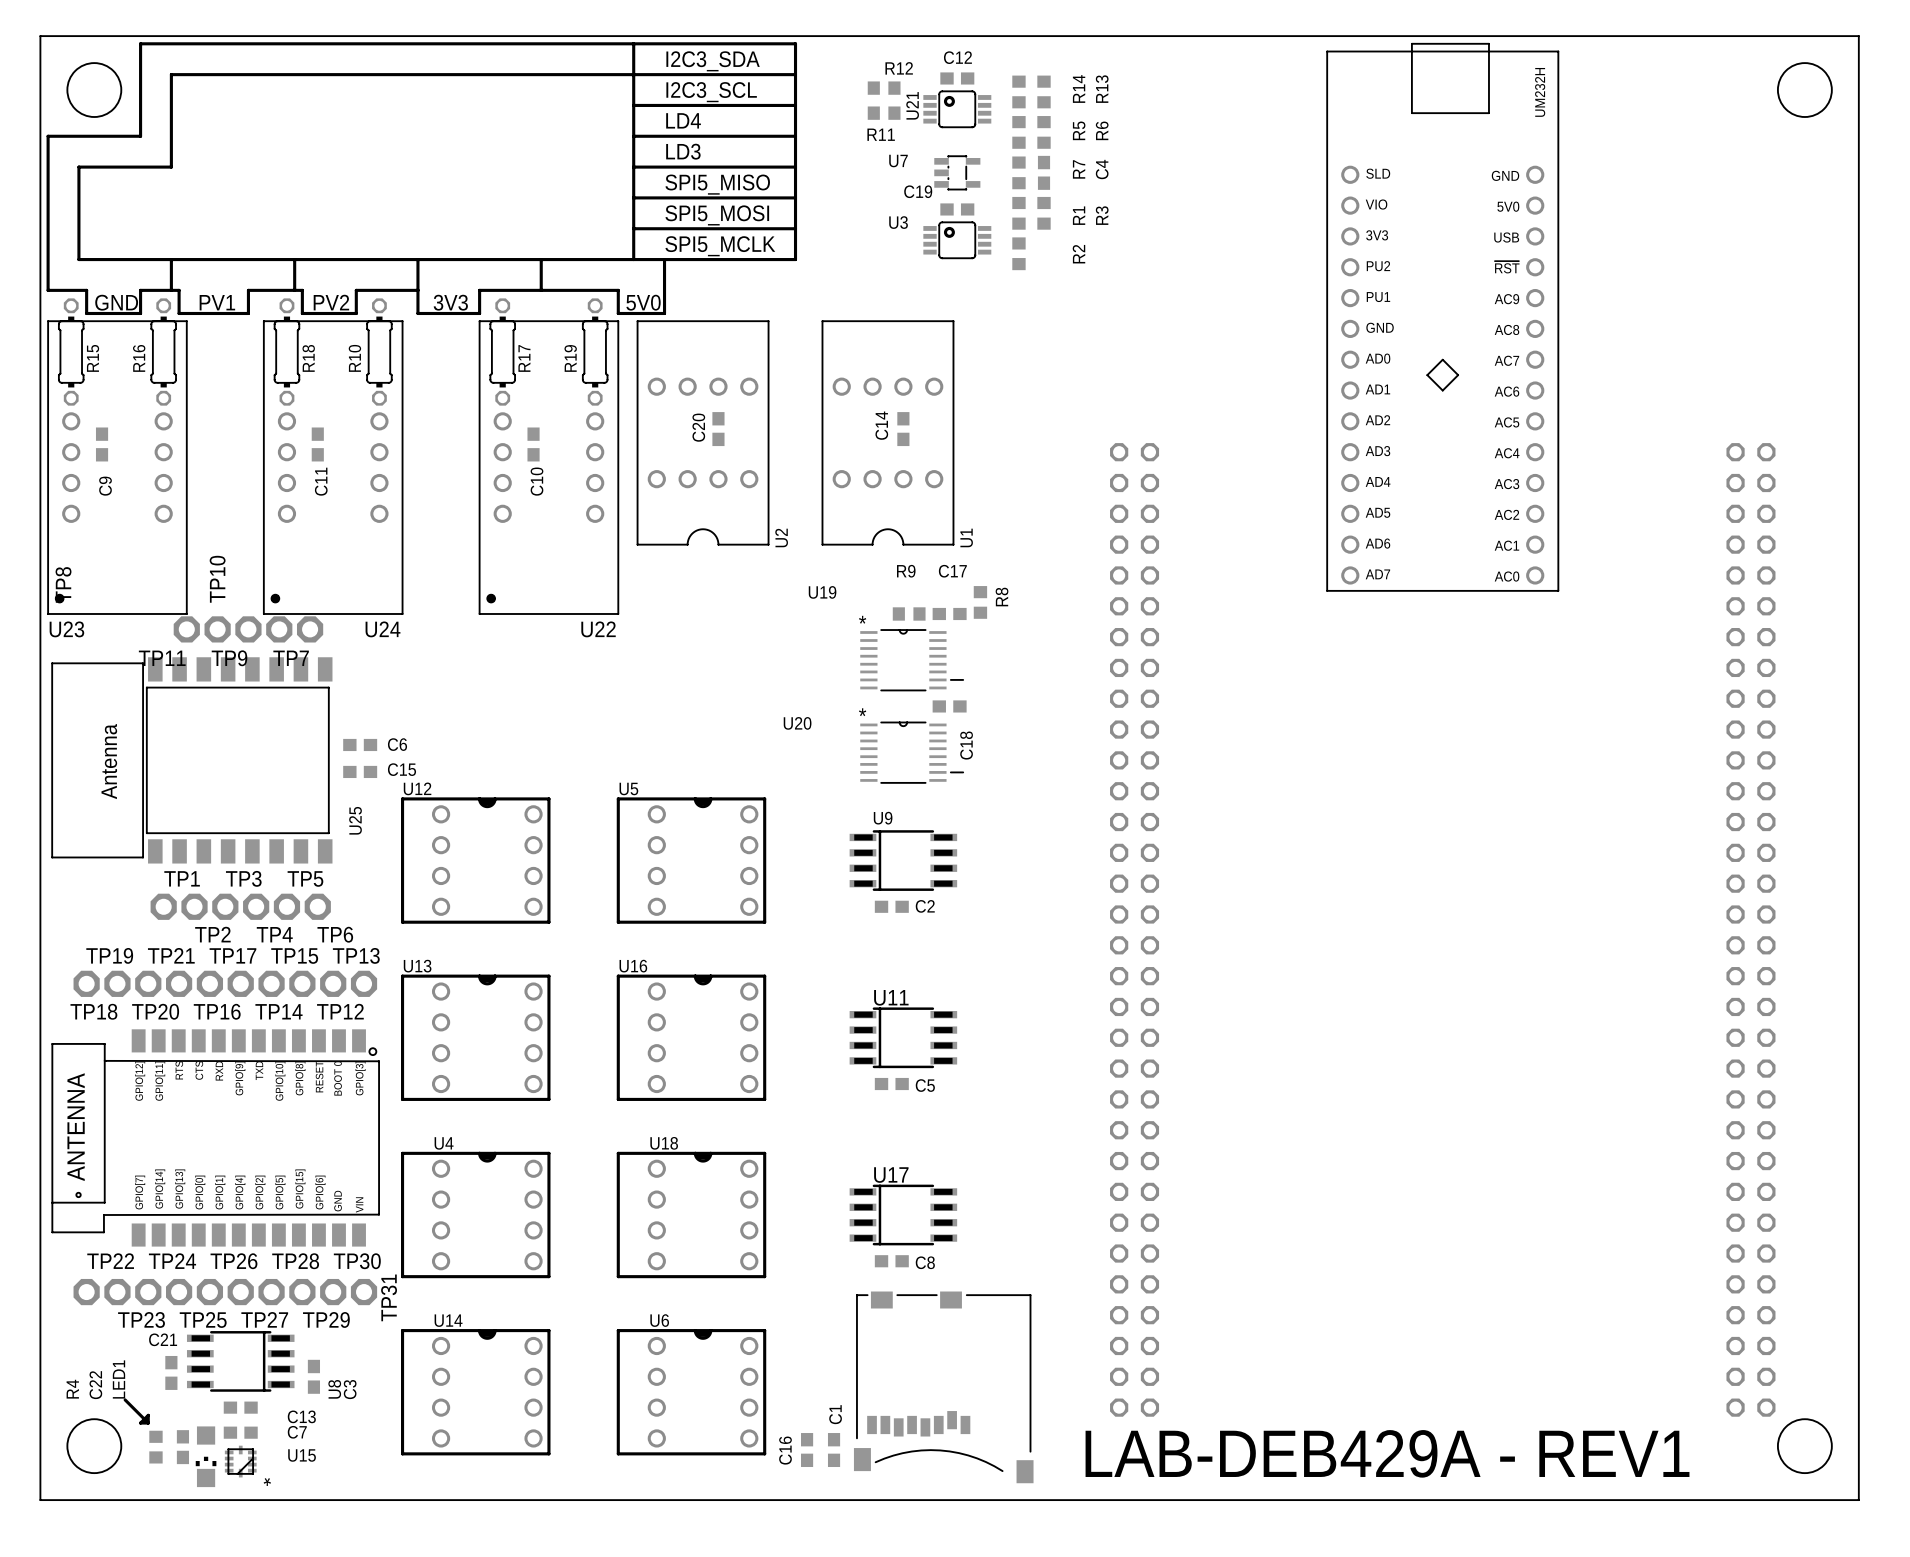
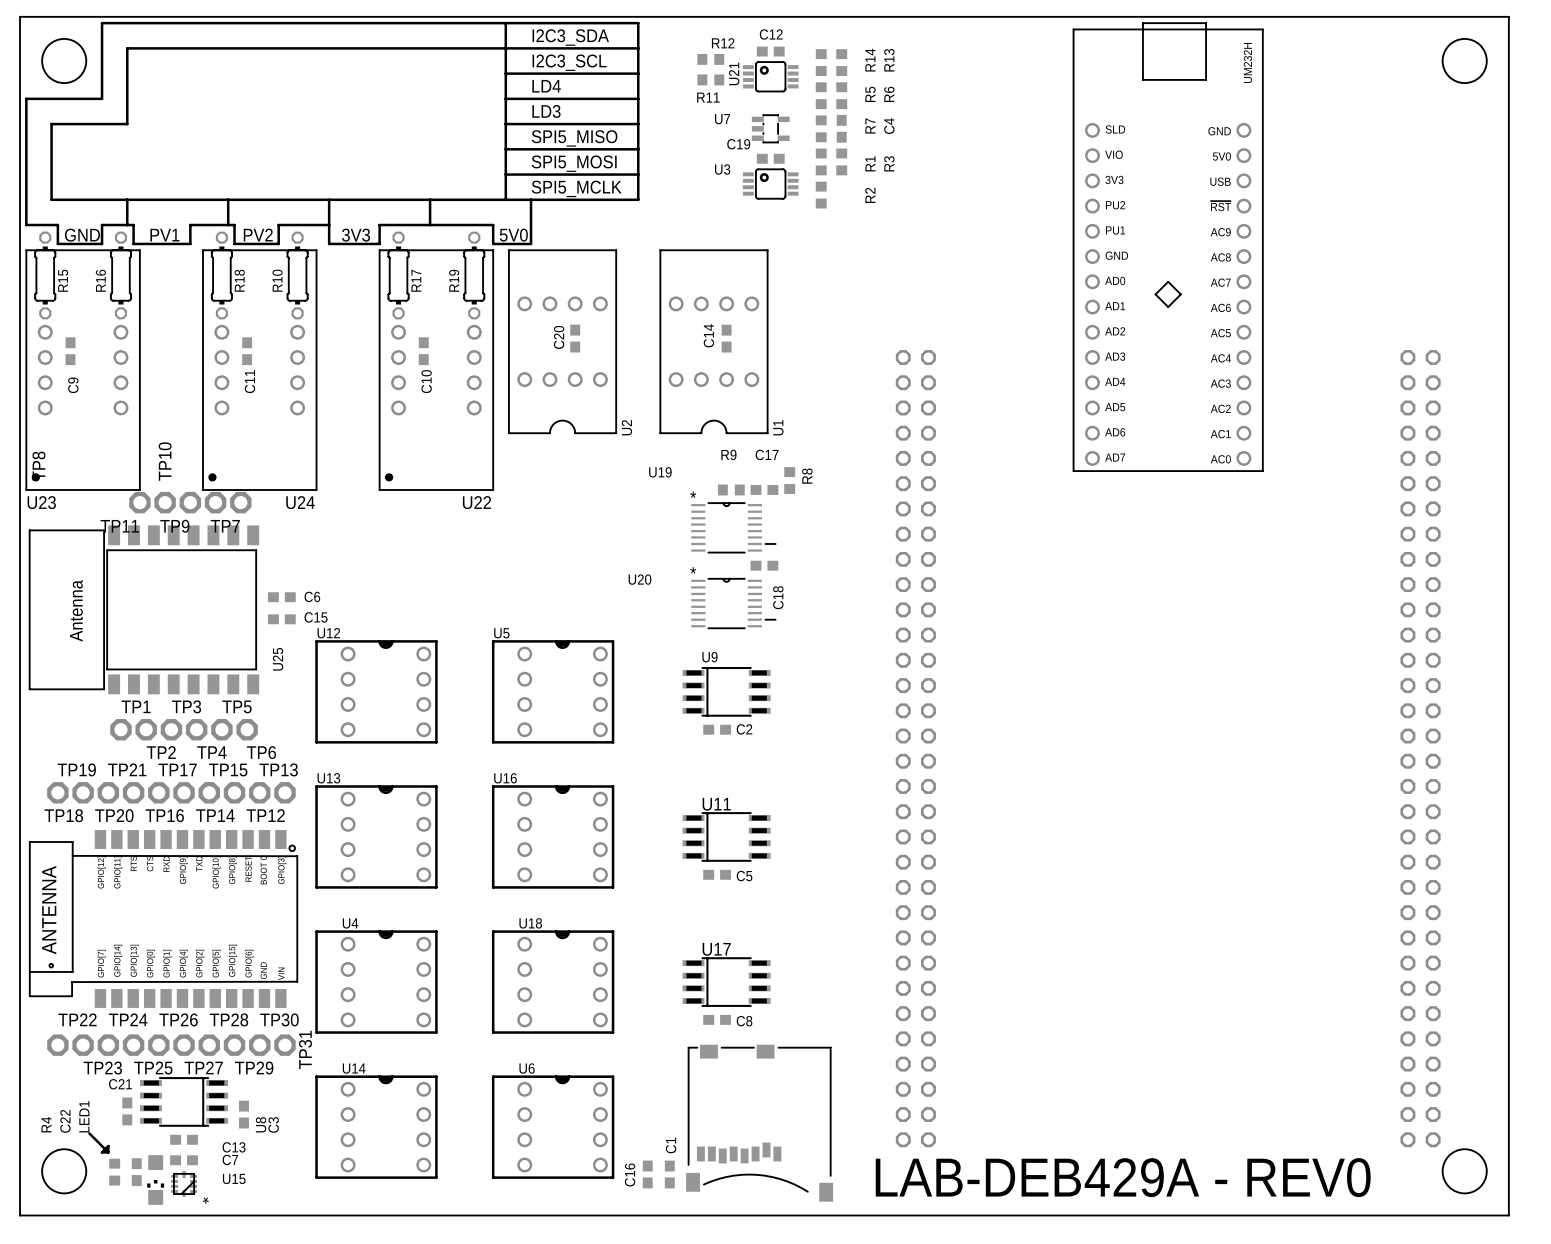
text: LAB-DEB429A - REV1 (1387, 1453) -> LAB-DEB429A - REV0 (1123, 1177)

